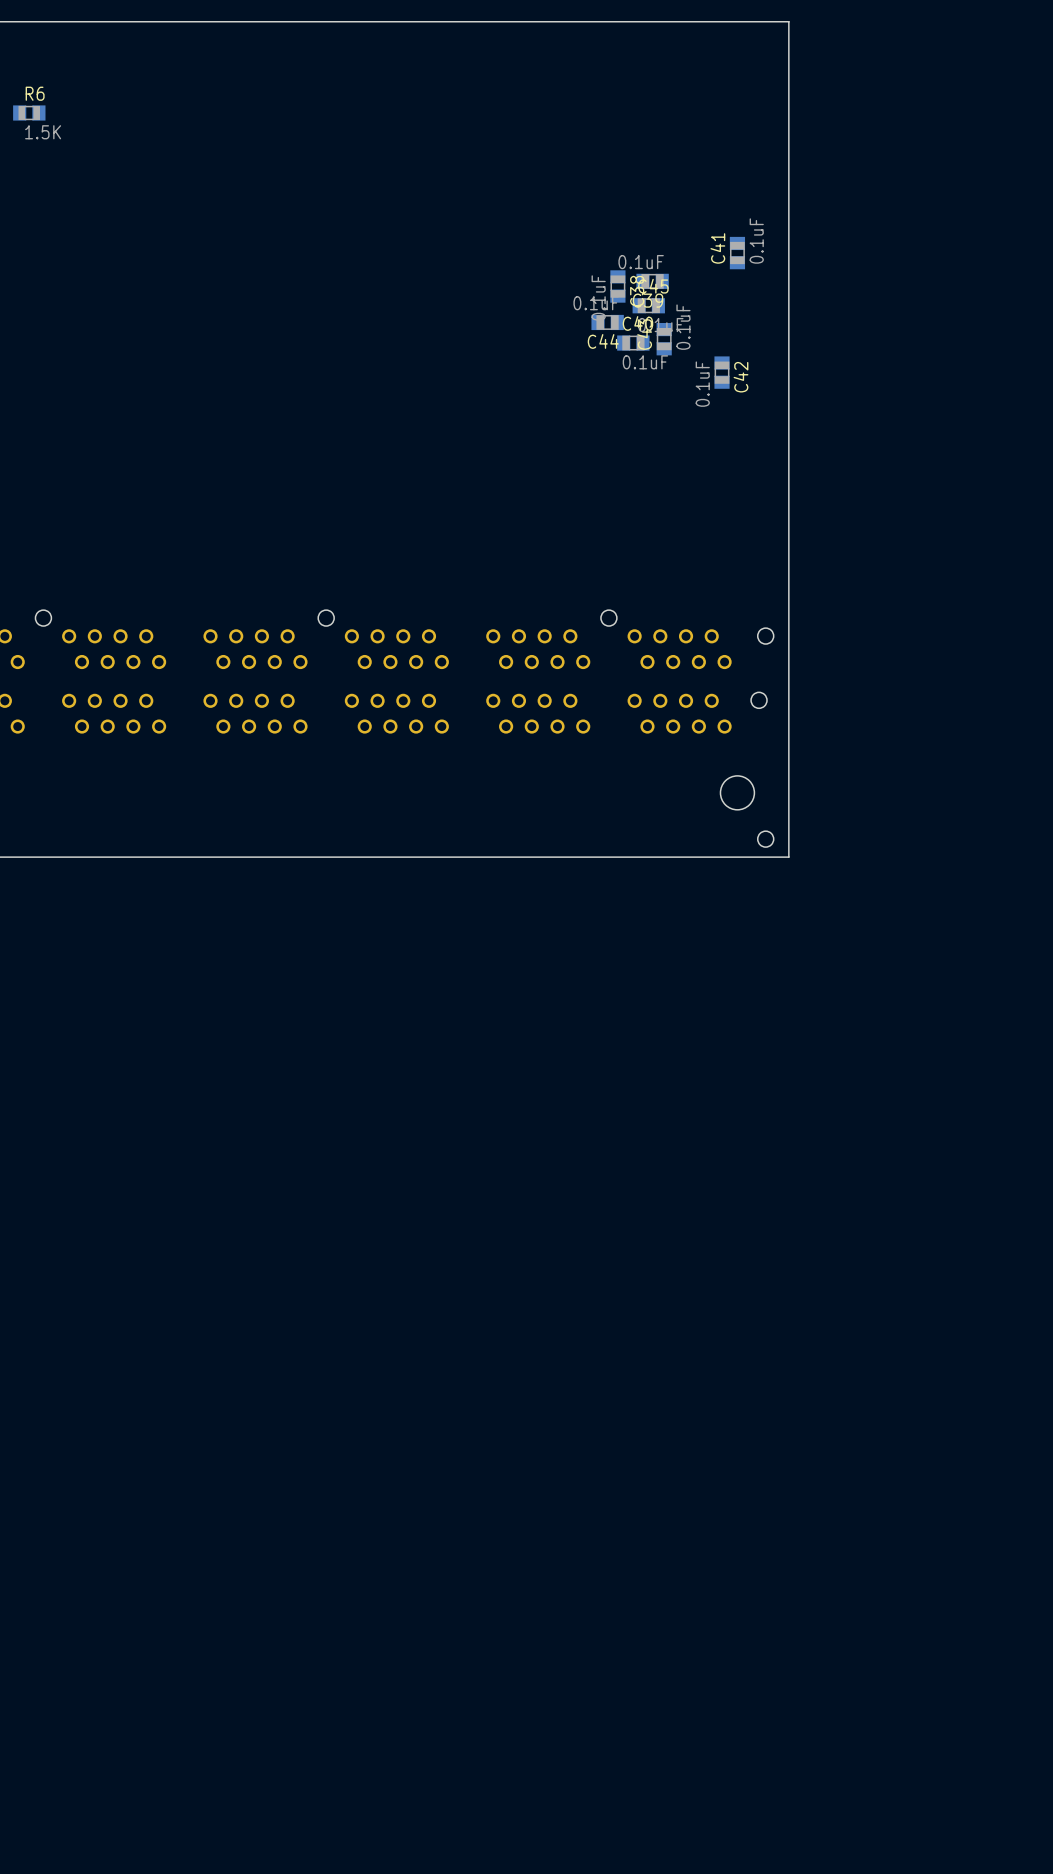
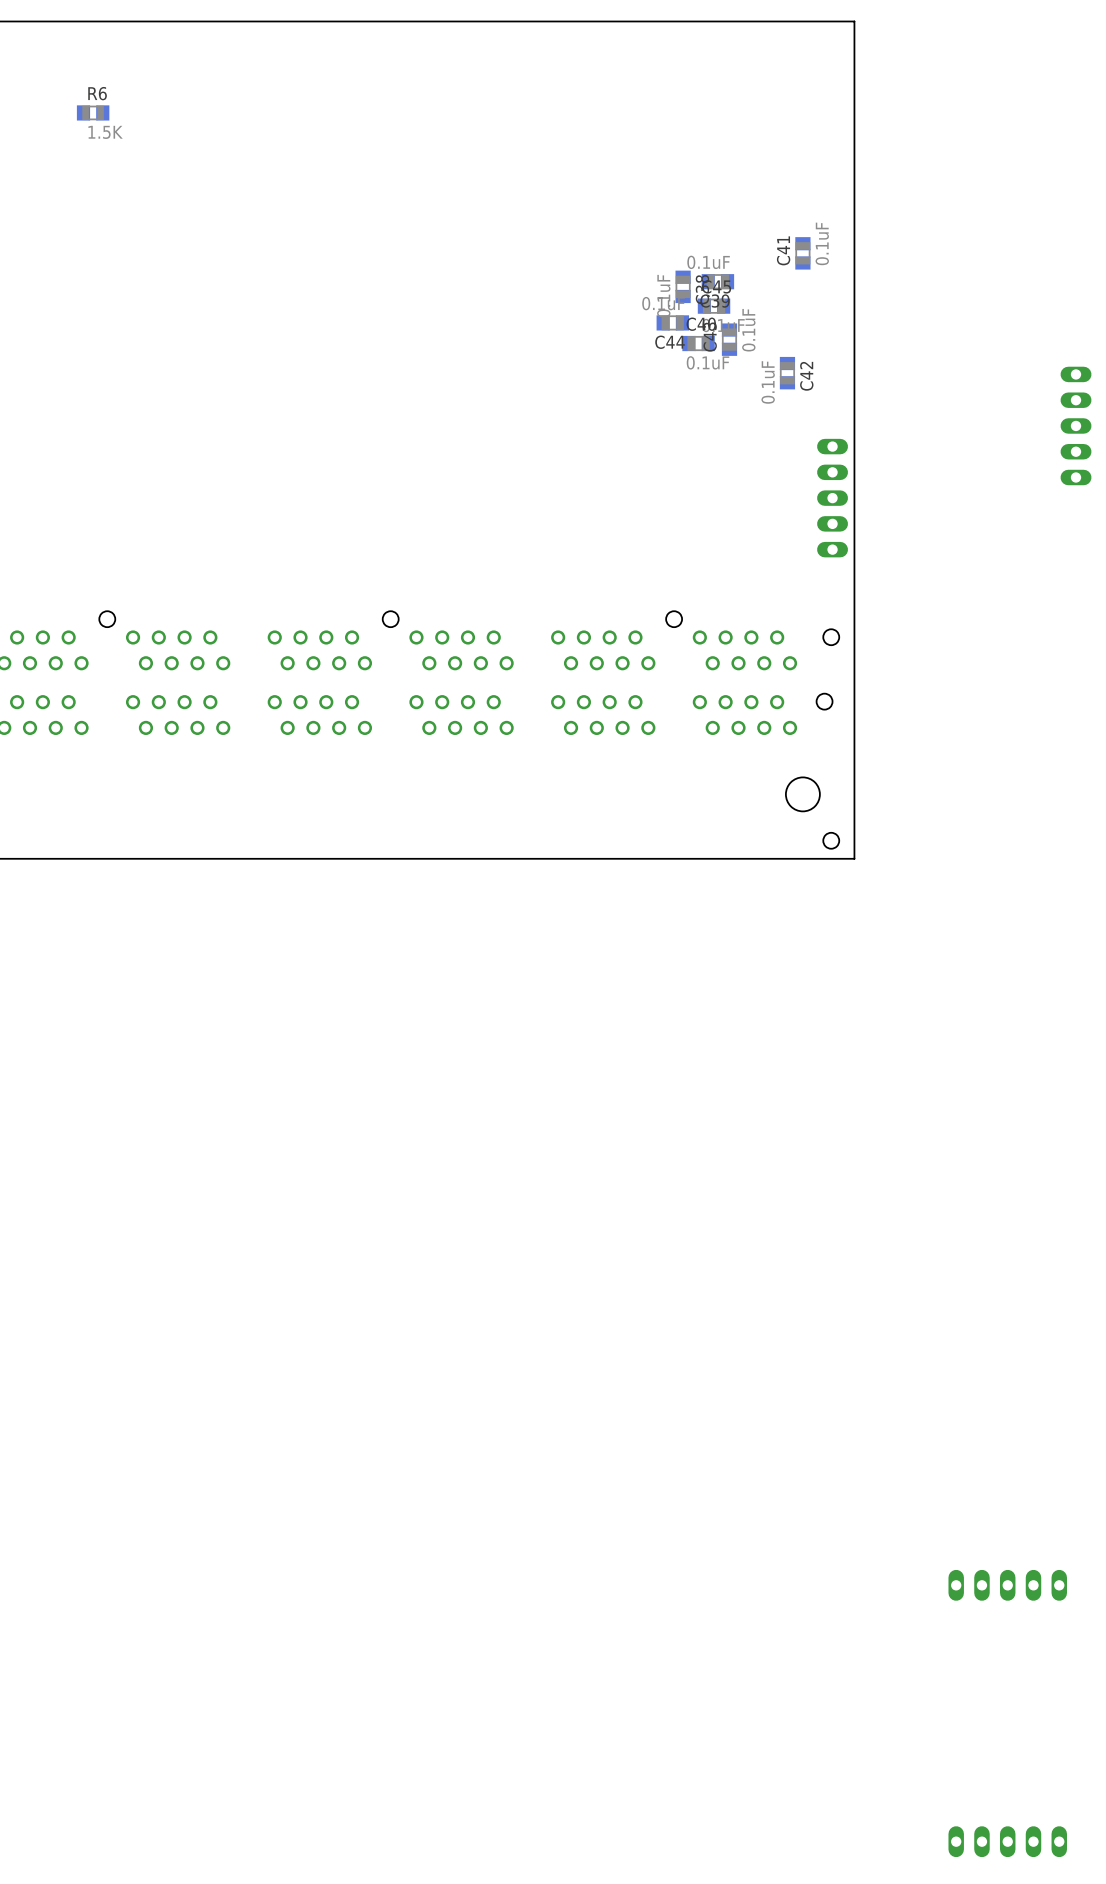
part: none -> (1076, 425)
part: none -> (832, 498)
part: none -> (1007, 1585)
part: none -> (1007, 1841)

